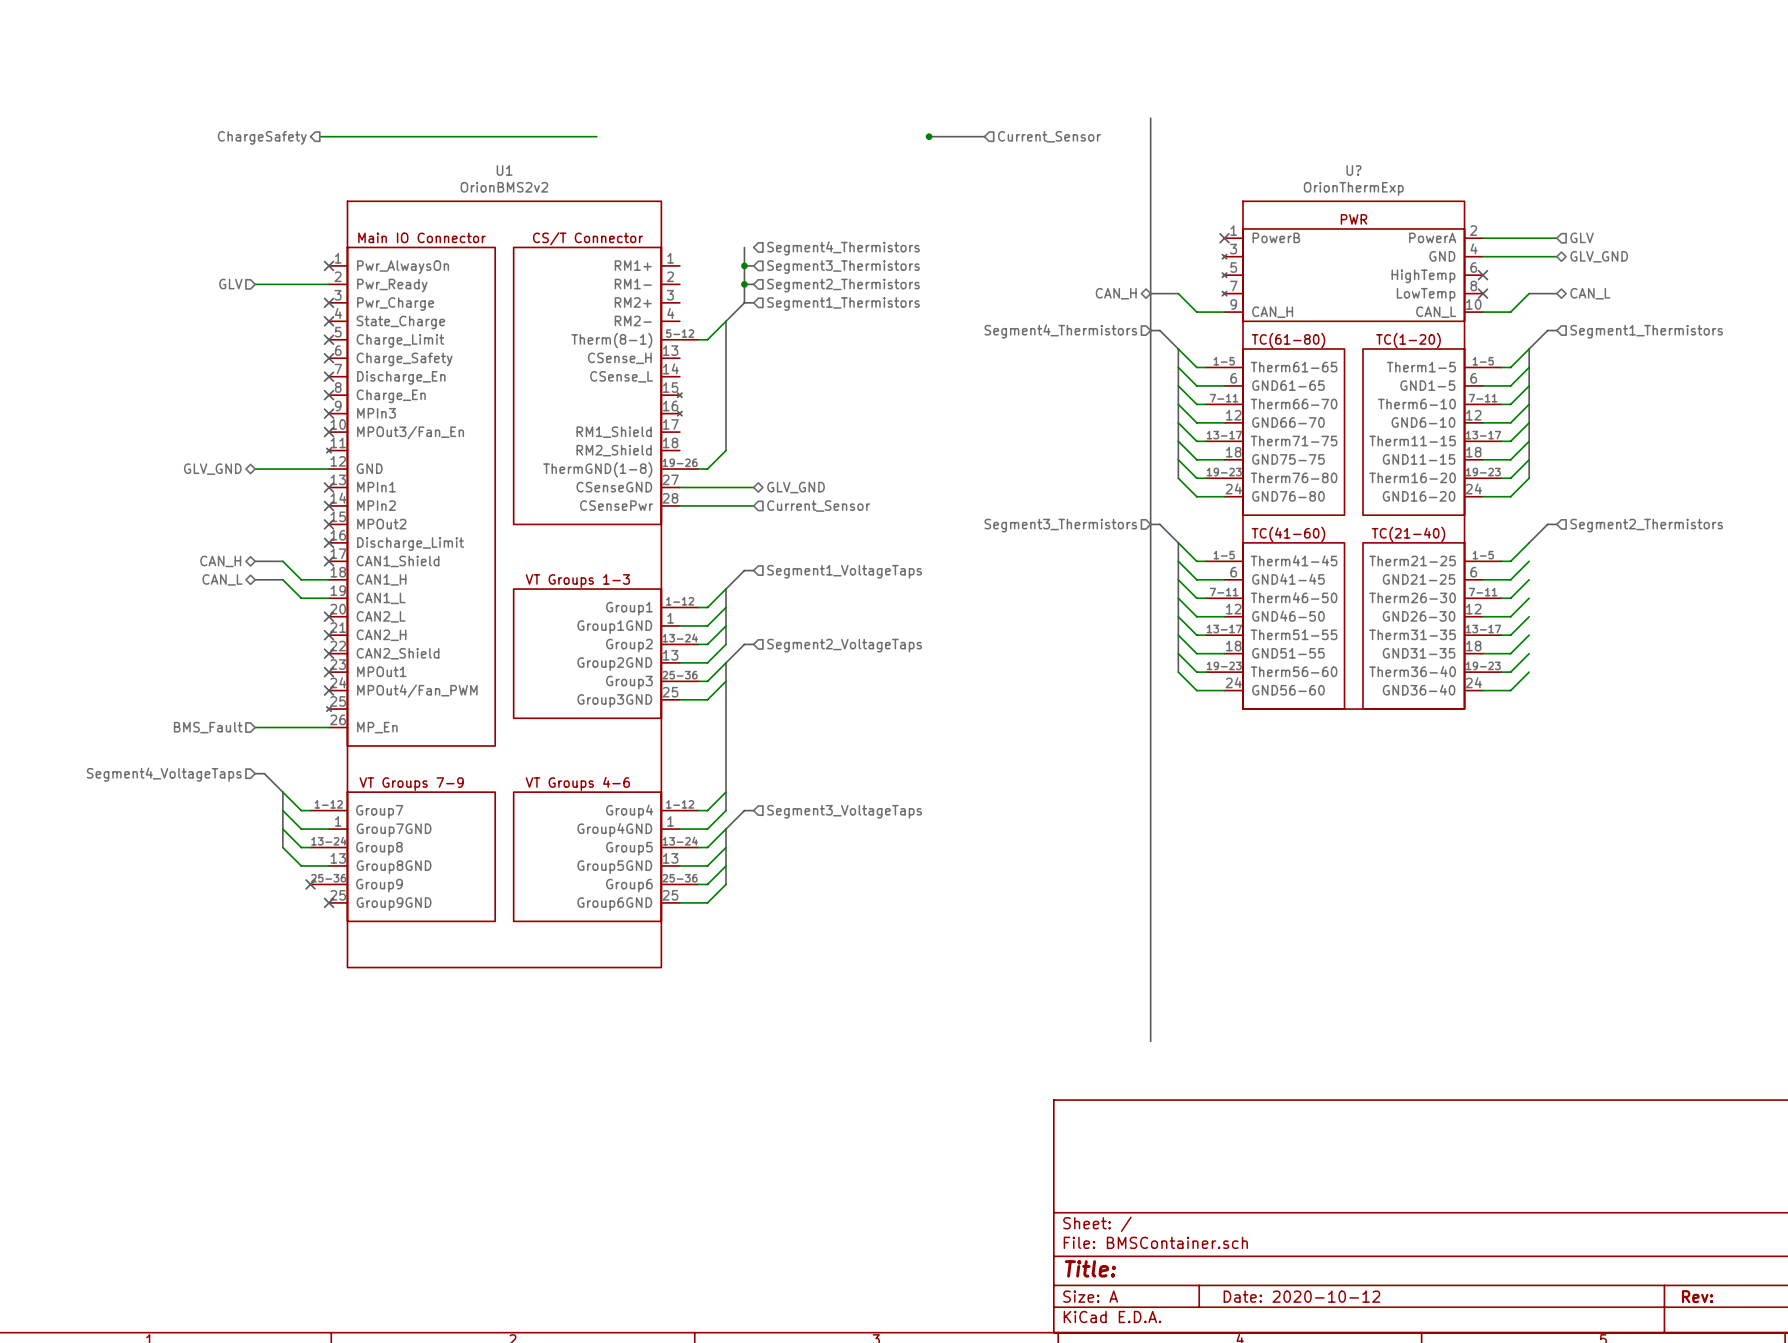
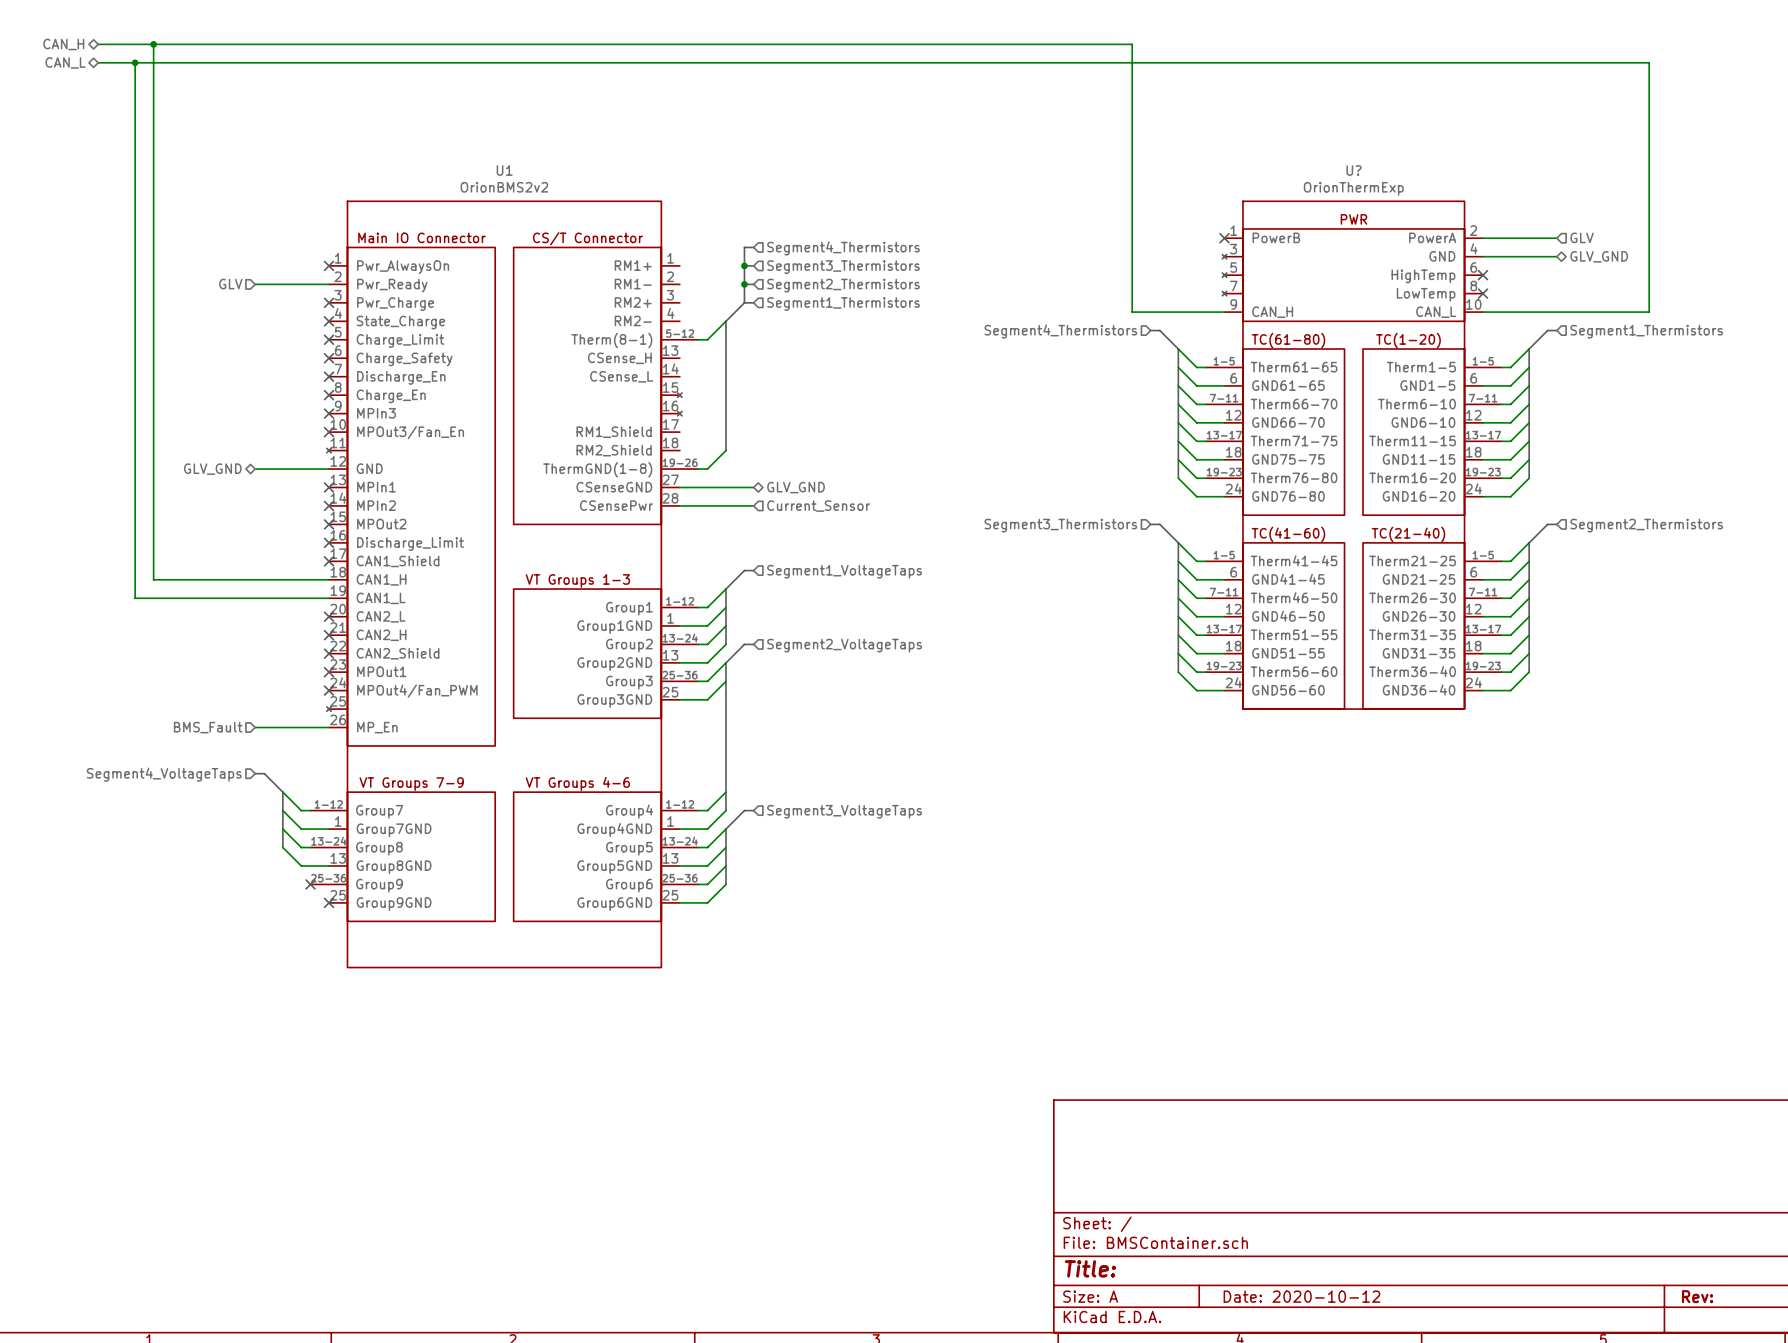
hierarchical label: none -> CAN_H (63, 44)
junction: none -> (153, 44)
hierarchical label: none -> CAN_L (65, 62)
junction: none -> (135, 62)
bus: (1150, 118) (1150, 1041) -> none
wire: (319, 136) (596, 136) -> none
bus: (929, 136) (984, 136) -> none
junction: (929, 136) -> none
hierarchical label: Current_Sensor (1049, 136) -> none
hierarchical label: ChargeSafety (262, 137) -> none
bus: none -> (744, 247) (753, 247)
hierarchical label: CAN_H (1116, 293) -> none
bus: (1150, 293) (1178, 293) -> none
wire: (1178, 293) (1196, 312) -> (98, 44) (1132, 44) (1132, 312) (1196, 312)
wire: (1529, 293) (1510, 312) -> (98, 62) (1649, 62) (1649, 312) (1510, 312)
bus: (1529, 293) (1556, 293) -> none
hierarchical label: CAN_L (1590, 293) -> none
bus: none -> (1529, 542) (1529, 672)
hierarchical label: CAN_H (220, 561) -> none
bus: (255, 561) (282, 561) -> none
wire: (282, 561) (301, 579) -> (153, 44) (153, 579) (301, 579)
hierarchical label: CAN_L (222, 579) -> none
bus: (255, 579) (282, 579) -> none
wire: (282, 579) (301, 598) -> (135, 62) (135, 598) (301, 598)

